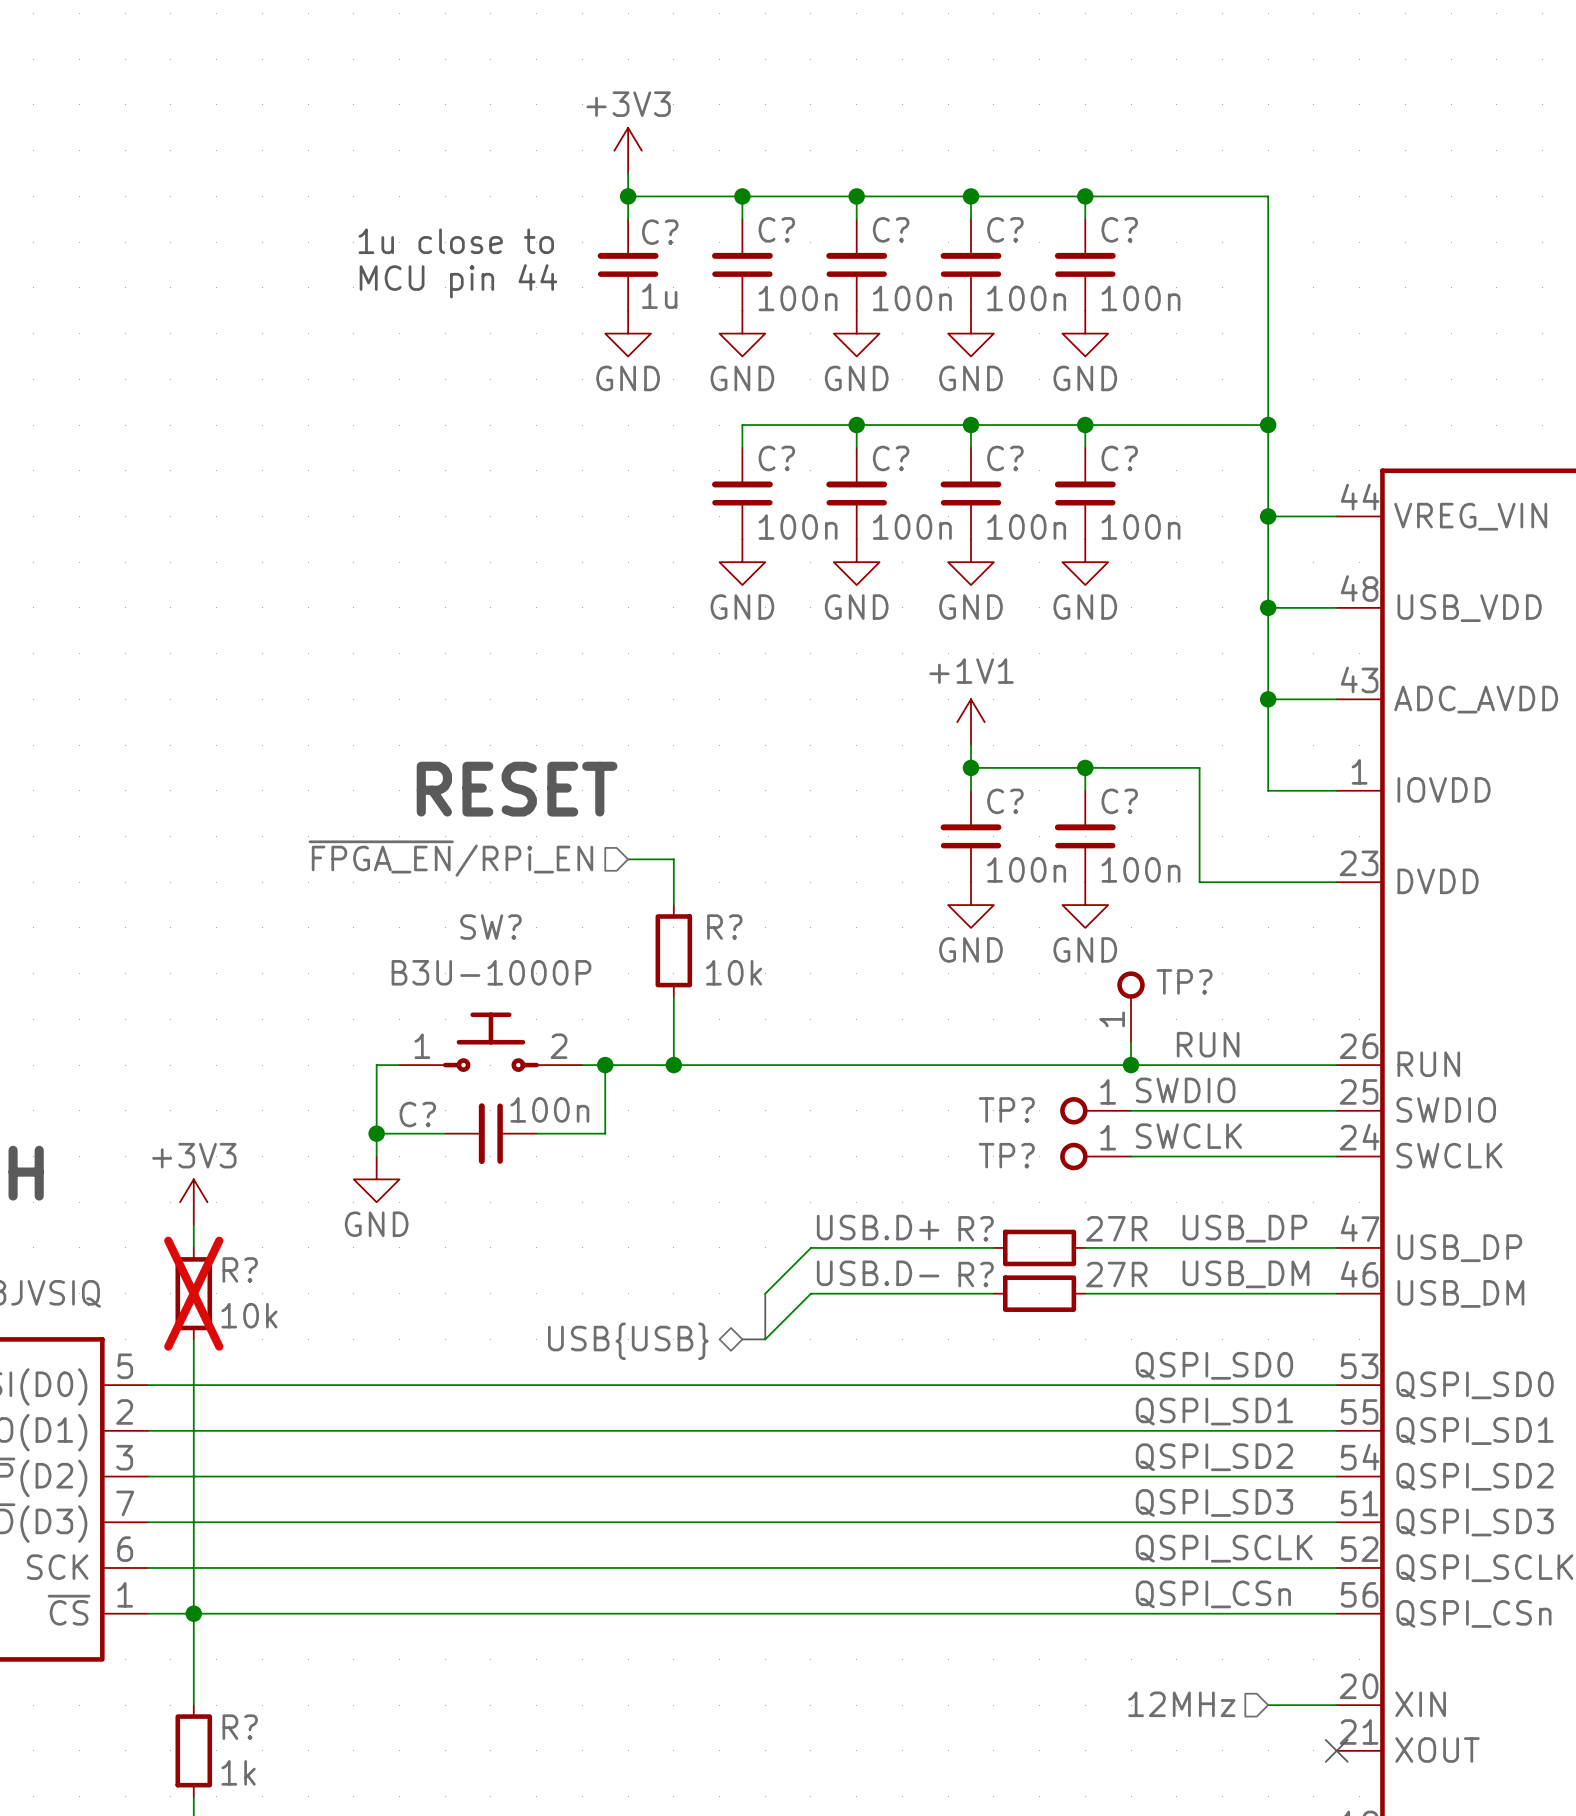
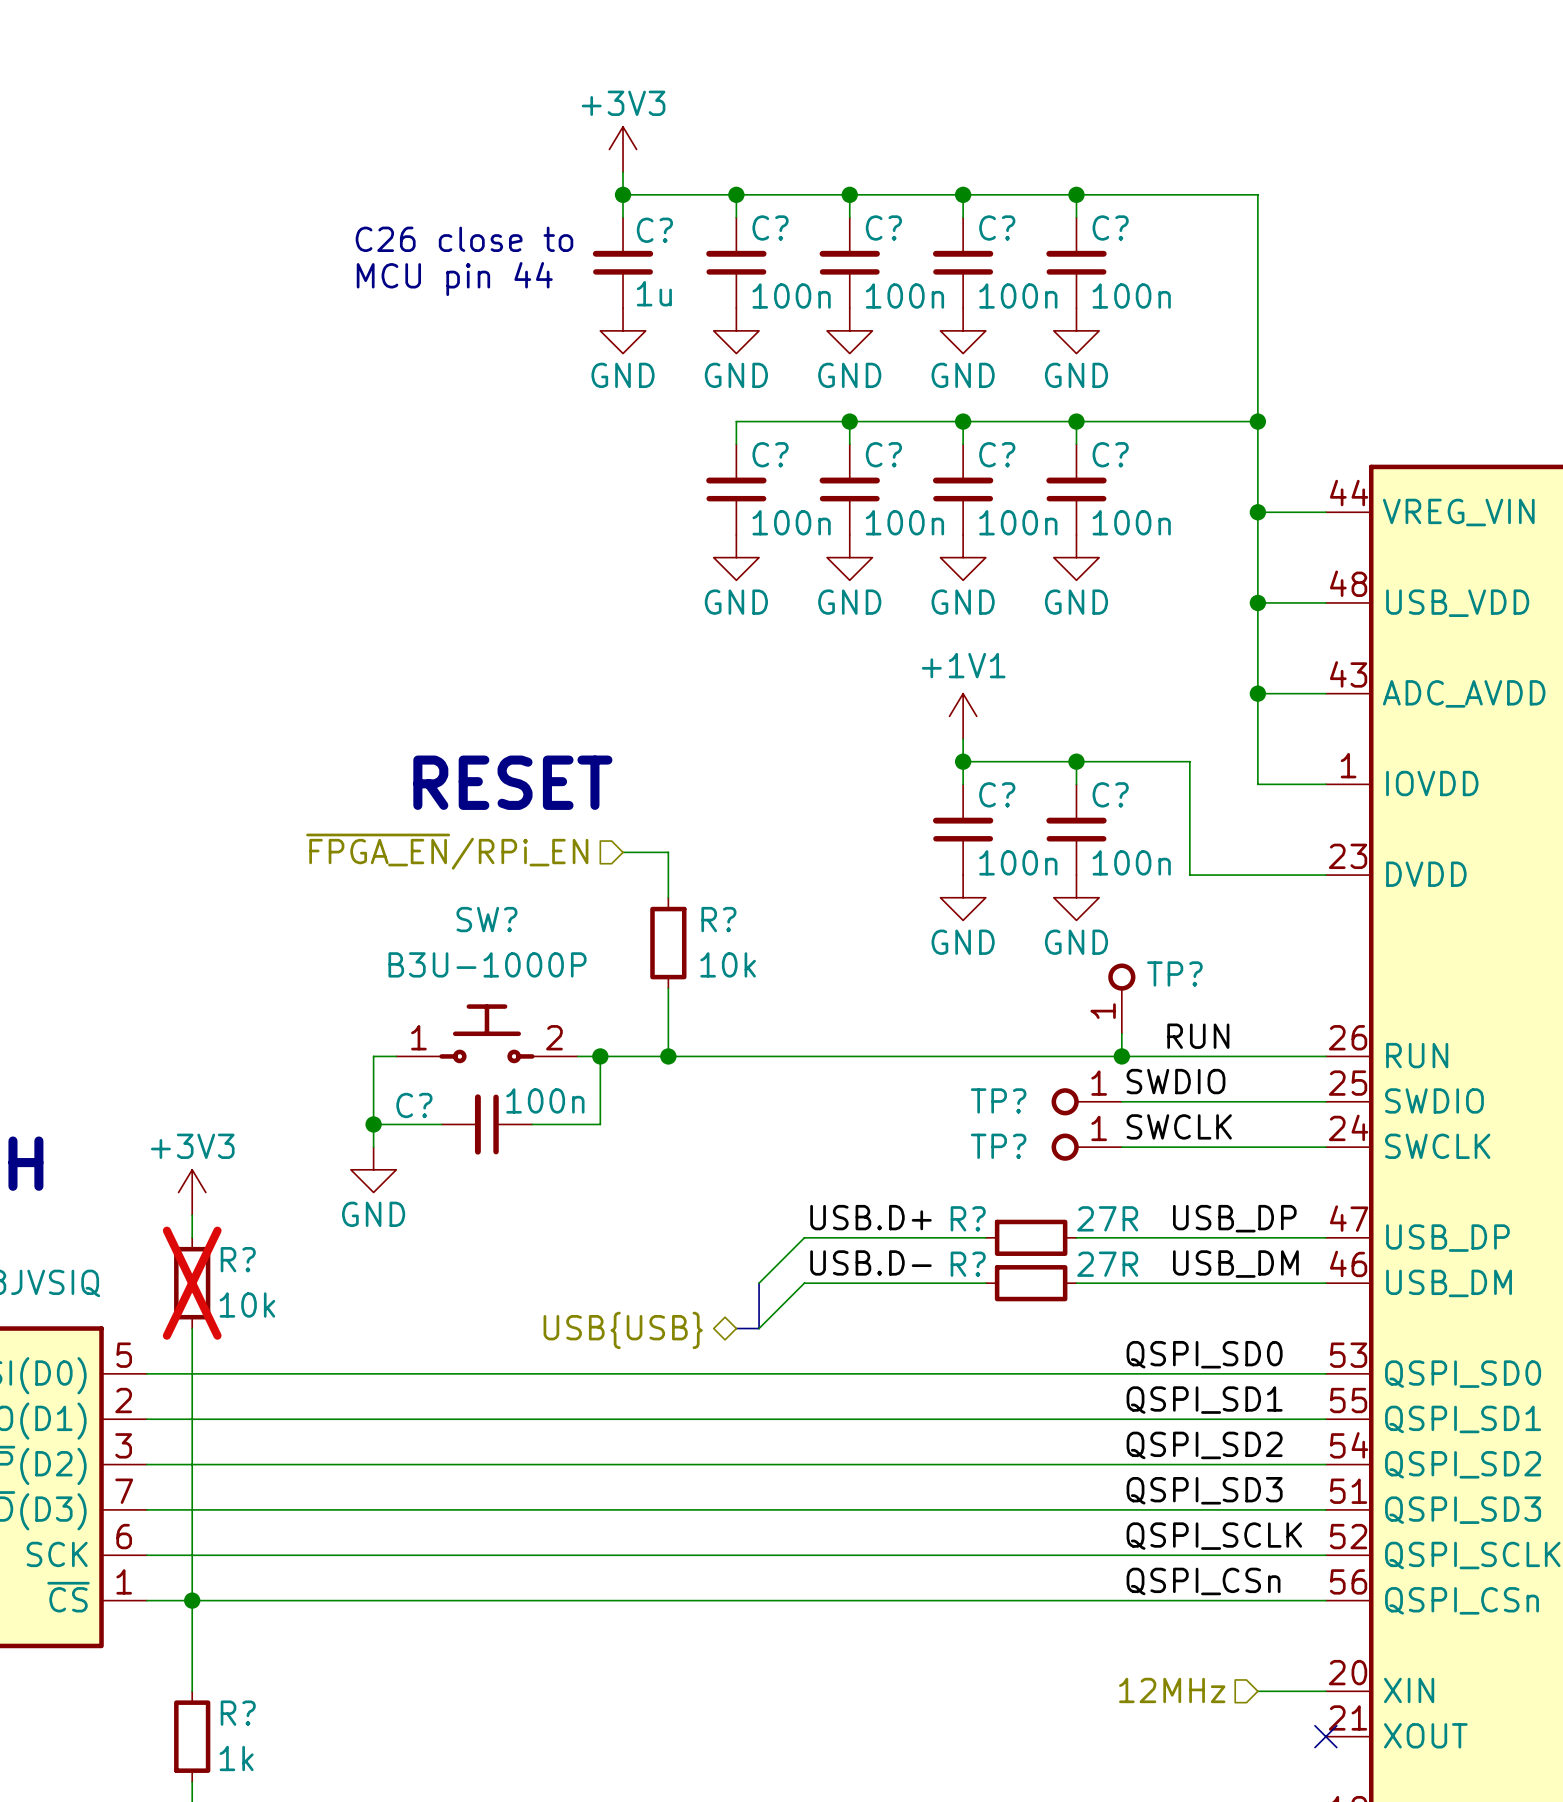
text: 1u close to (456, 241) -> C26 close to (464, 239)

